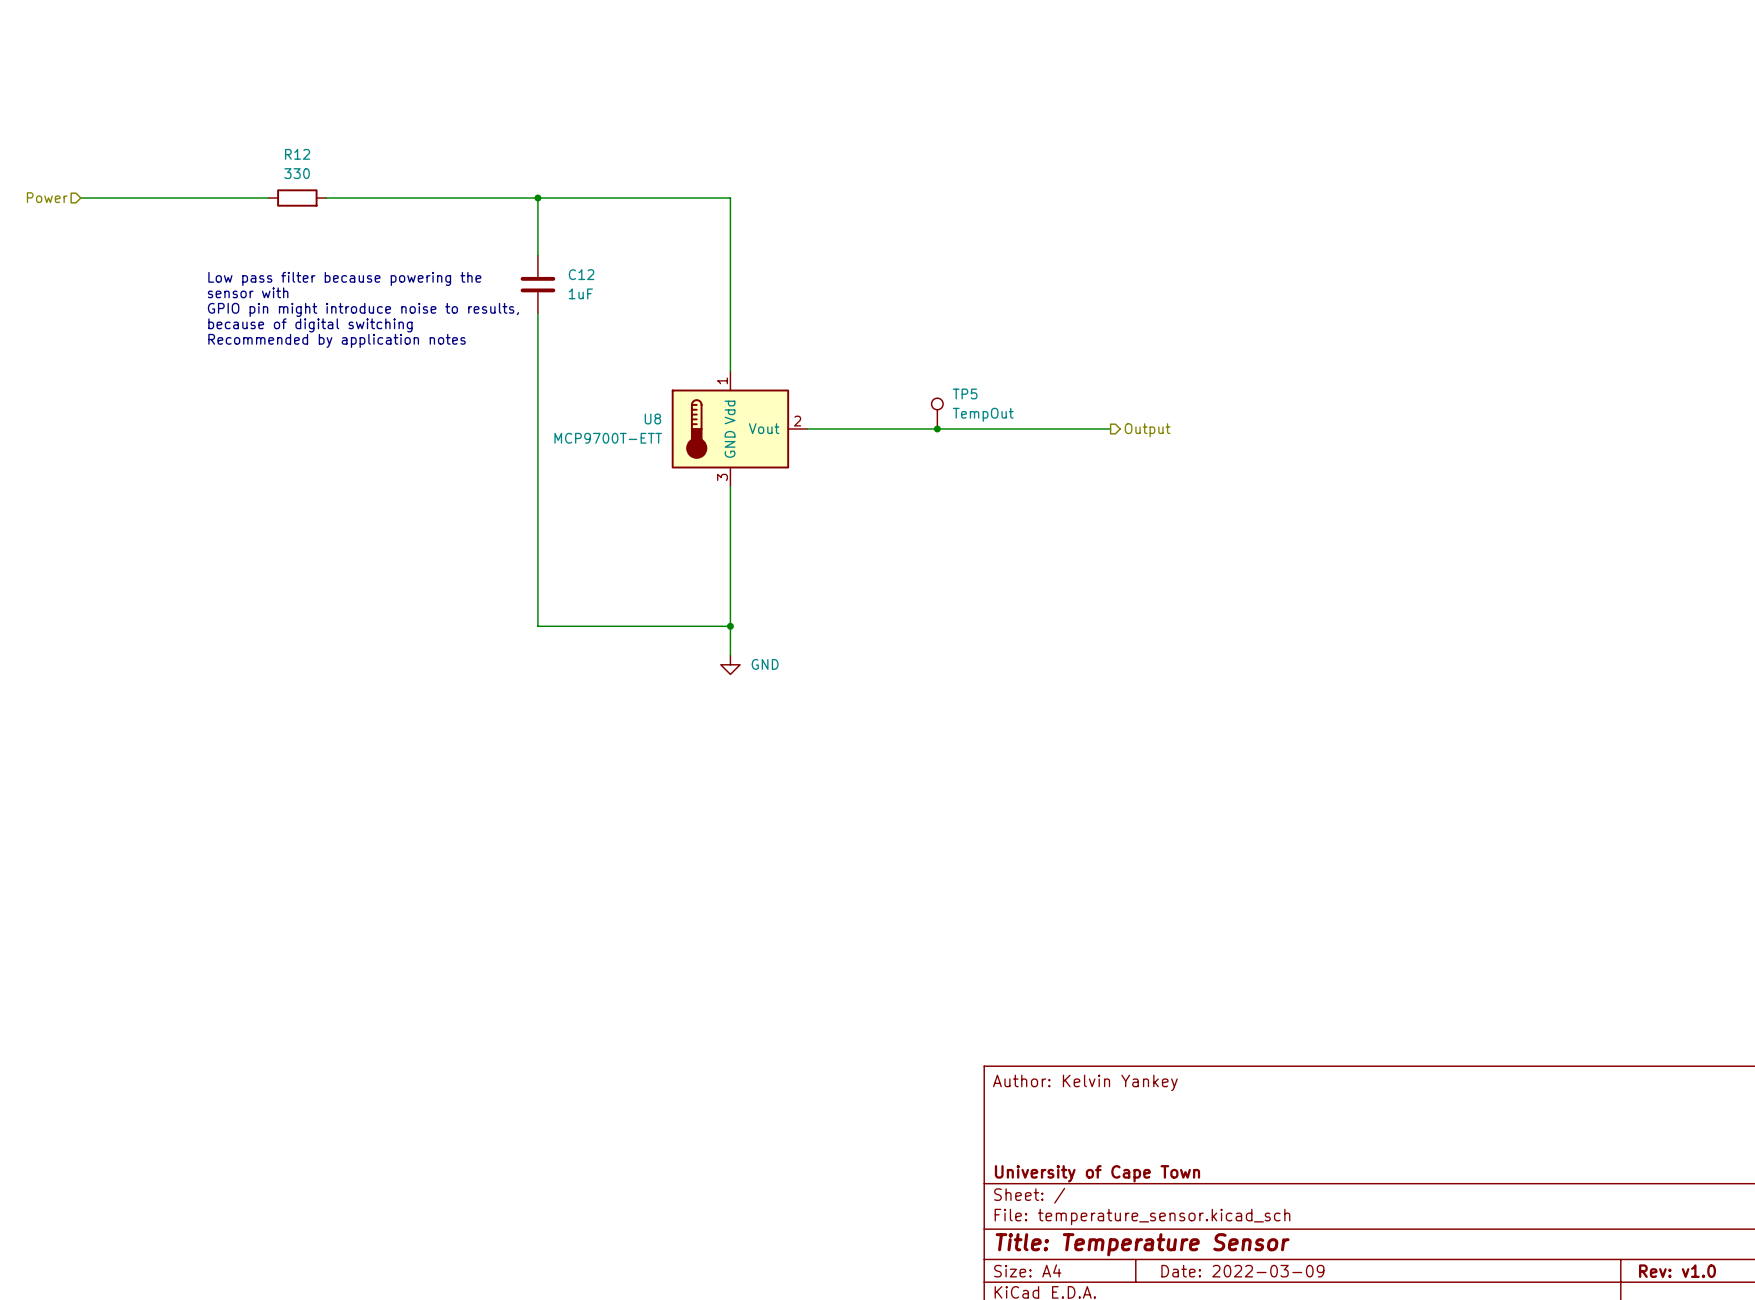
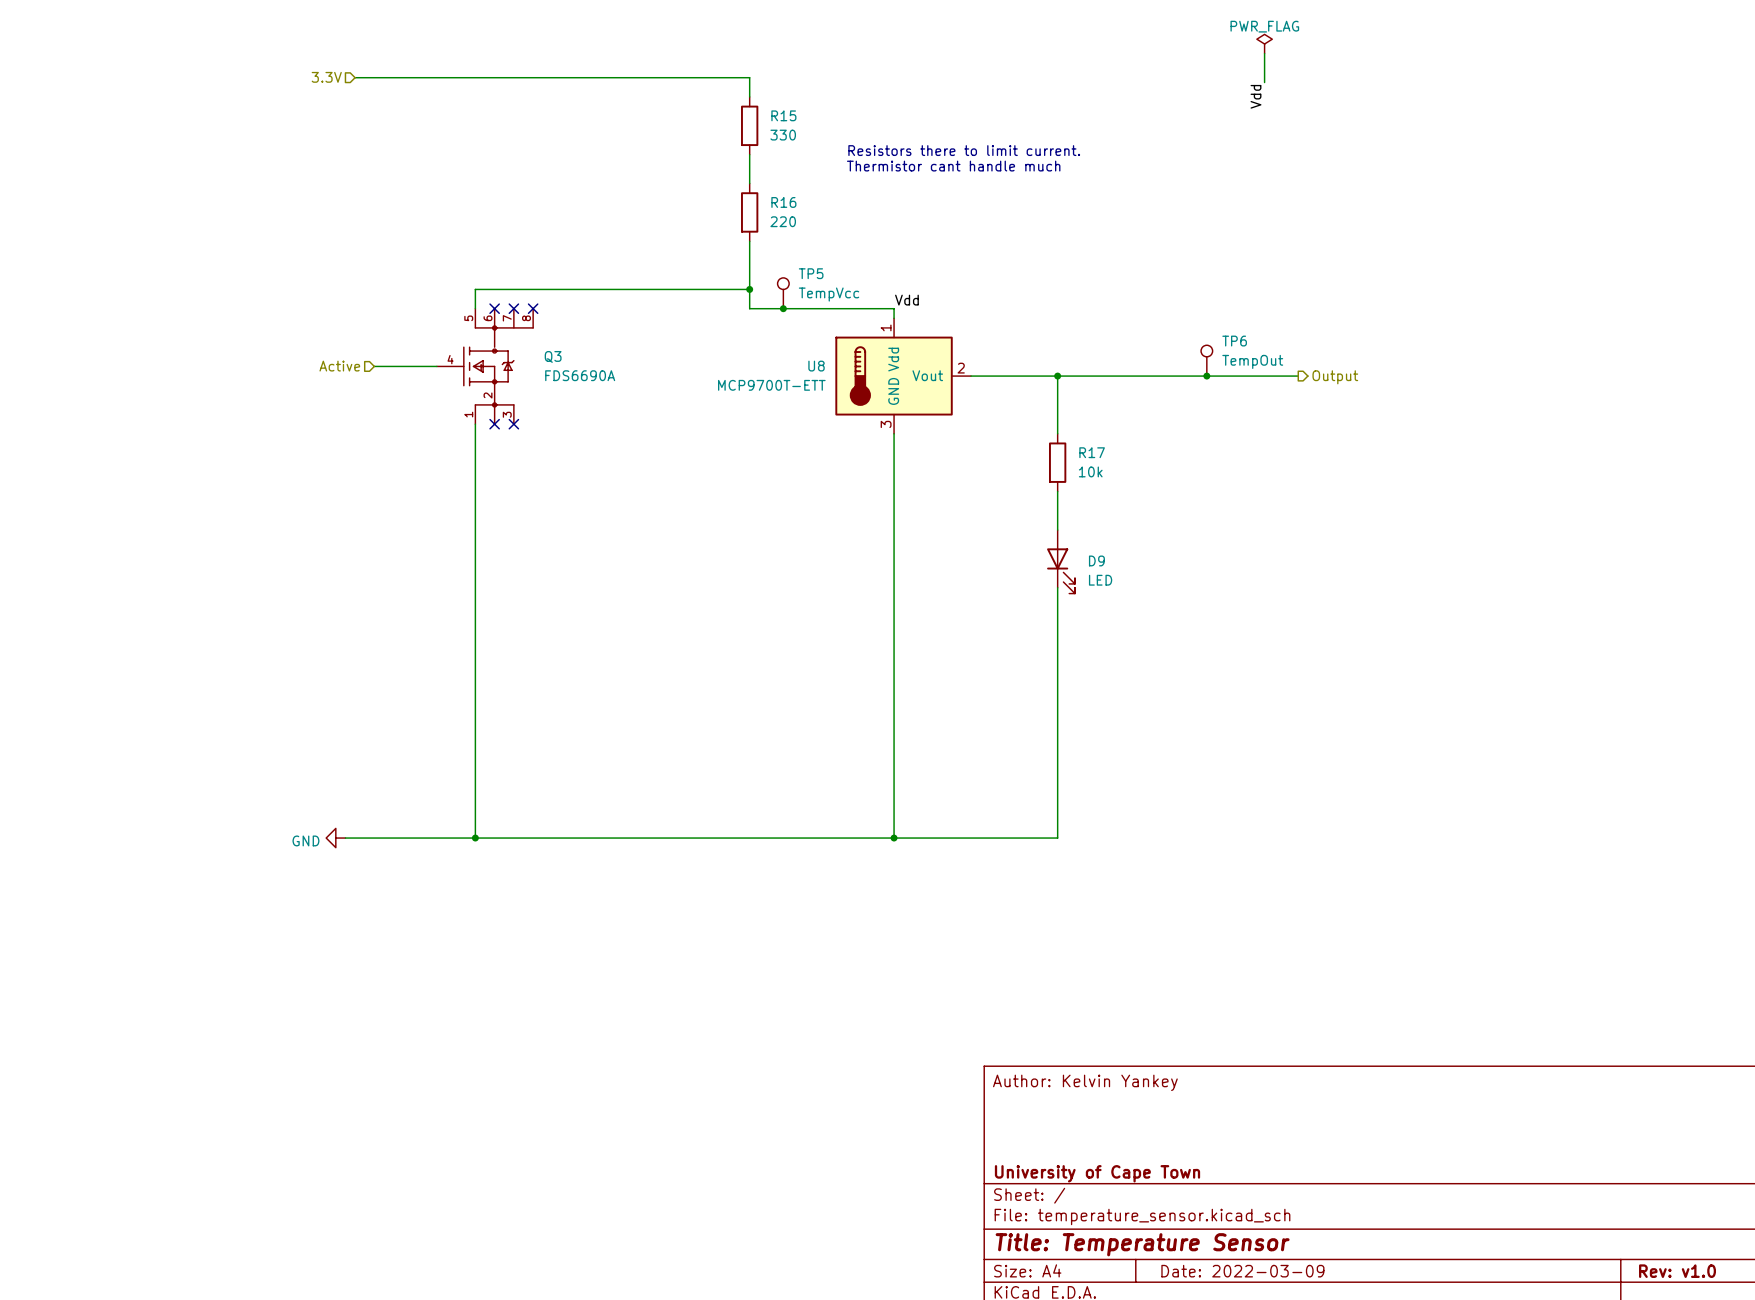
power symbol: none -> PWR_FLAG (1264, 44)
wire: none -> (1264, 53) (1264, 82)
hierarchical label: none -> 3.3V (326, 77)
wire: none -> (355, 77) (749, 77) (749, 96)
label: none -> Vdd (1255, 96)
R15: none -> 330 (749, 125)
text: none -> Resistors there to limit current. (964, 150)
wire: none -> (749, 154) (749, 183)
text: none -> Thermistor cant handle much (953, 166)
hierarchical label: Power (47, 197) -> none
wire: (80, 198) (268, 198) -> none
R12: 330 (297, 198) -> none
wire: (326, 198) (730, 198) (730, 371) -> none
wire: (537, 198) (537, 255) -> none
junction: (537, 198) -> none
R16: none -> 220 (749, 212)
wire: none -> (749, 241) (749, 308) (894, 308) (894, 318)
text: Low pass filter because powering the (344, 278) -> none
C12: 1uF (537, 284) -> none
wire: none -> (749, 289) (475, 289) (475, 308)
junction: none -> (749, 289)
text: sensor with (248, 292) -> none
label: none -> Vdd (906, 300)
no-connect mark: none -> (494, 308)
no-connect mark: none -> (513, 308)
no-connect mark: none -> (533, 308)
junction: none -> (783, 308)
text: GPIO pin might introduce noise to results, (363, 309) -> none
wire: (537, 313) (537, 626) (730, 626) -> none
text: because of digital switching (310, 325) -> none
text: Recommended by application notes (337, 340) -> none
TP6: none -> TempOut (1206, 360)
hierarchical label: none -> Active (339, 366)
wire: none -> (374, 366) (436, 366)
Q3: none -> FDS6690A (485, 366)
wire: none -> (971, 376) (1298, 376)
wire: none -> (1057, 376) (1057, 433)
junction: none -> (1057, 376)
junction: none -> (1206, 376)
hierarchical label: none -> Output (1335, 377)
TP5 position: (937, 413) -> (783, 293)
TP5 value: TempOut (983, 414) -> TempVcc (829, 294)
wire: none -> (475, 424) (475, 838)
no-connect mark: none -> (494, 424)
no-connect mark: none -> (513, 424)
U8 position: (739, 429) -> (903, 376)
wire: (807, 429) (1110, 429) -> none
junction: (937, 429) -> none
hierarchical label: Output (1147, 430) -> none
wire: none -> (894, 433) (894, 838)
R17: none -> 10k (1057, 462)
wire: (730, 486) (730, 655) -> none
wire: none -> (1057, 491) (1057, 530)
D9: none -> LED (1061, 561)
wire: none -> (1057, 587) (1057, 838) (345, 838)
junction: (730, 626) -> none
power symbol: GND (730, 664) -> none
power symbol: none -> GND (335, 838)
junction: none -> (475, 838)
junction: none -> (894, 838)

